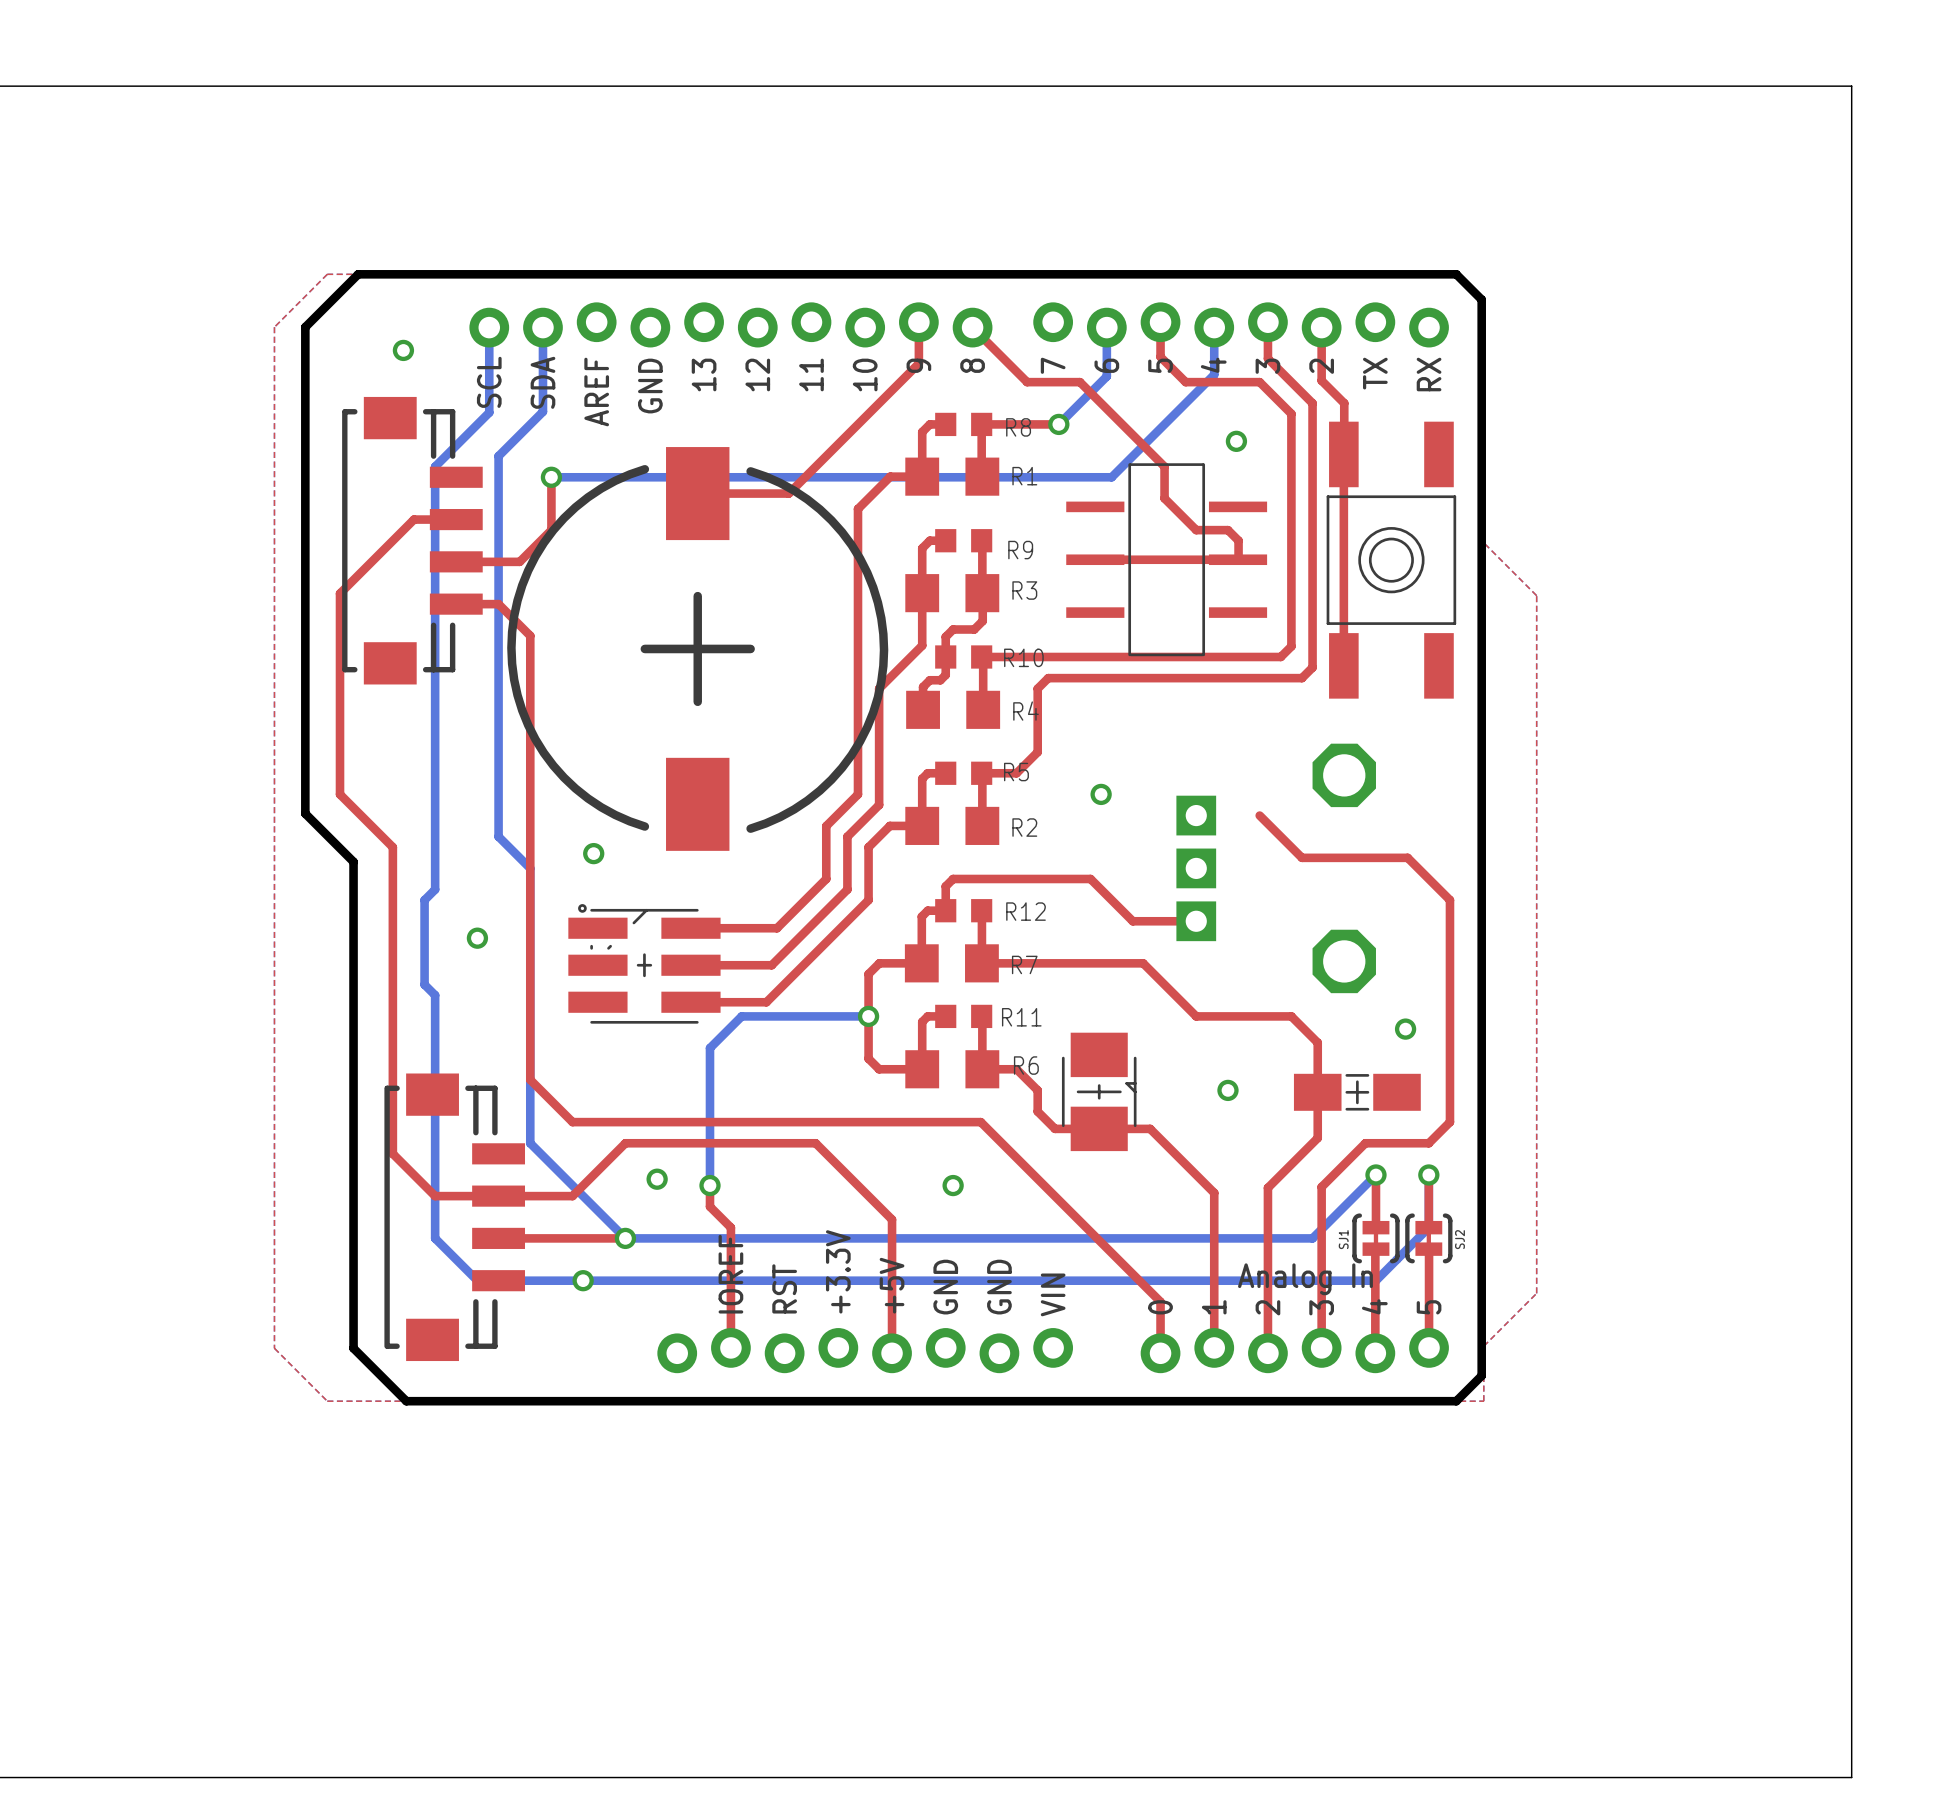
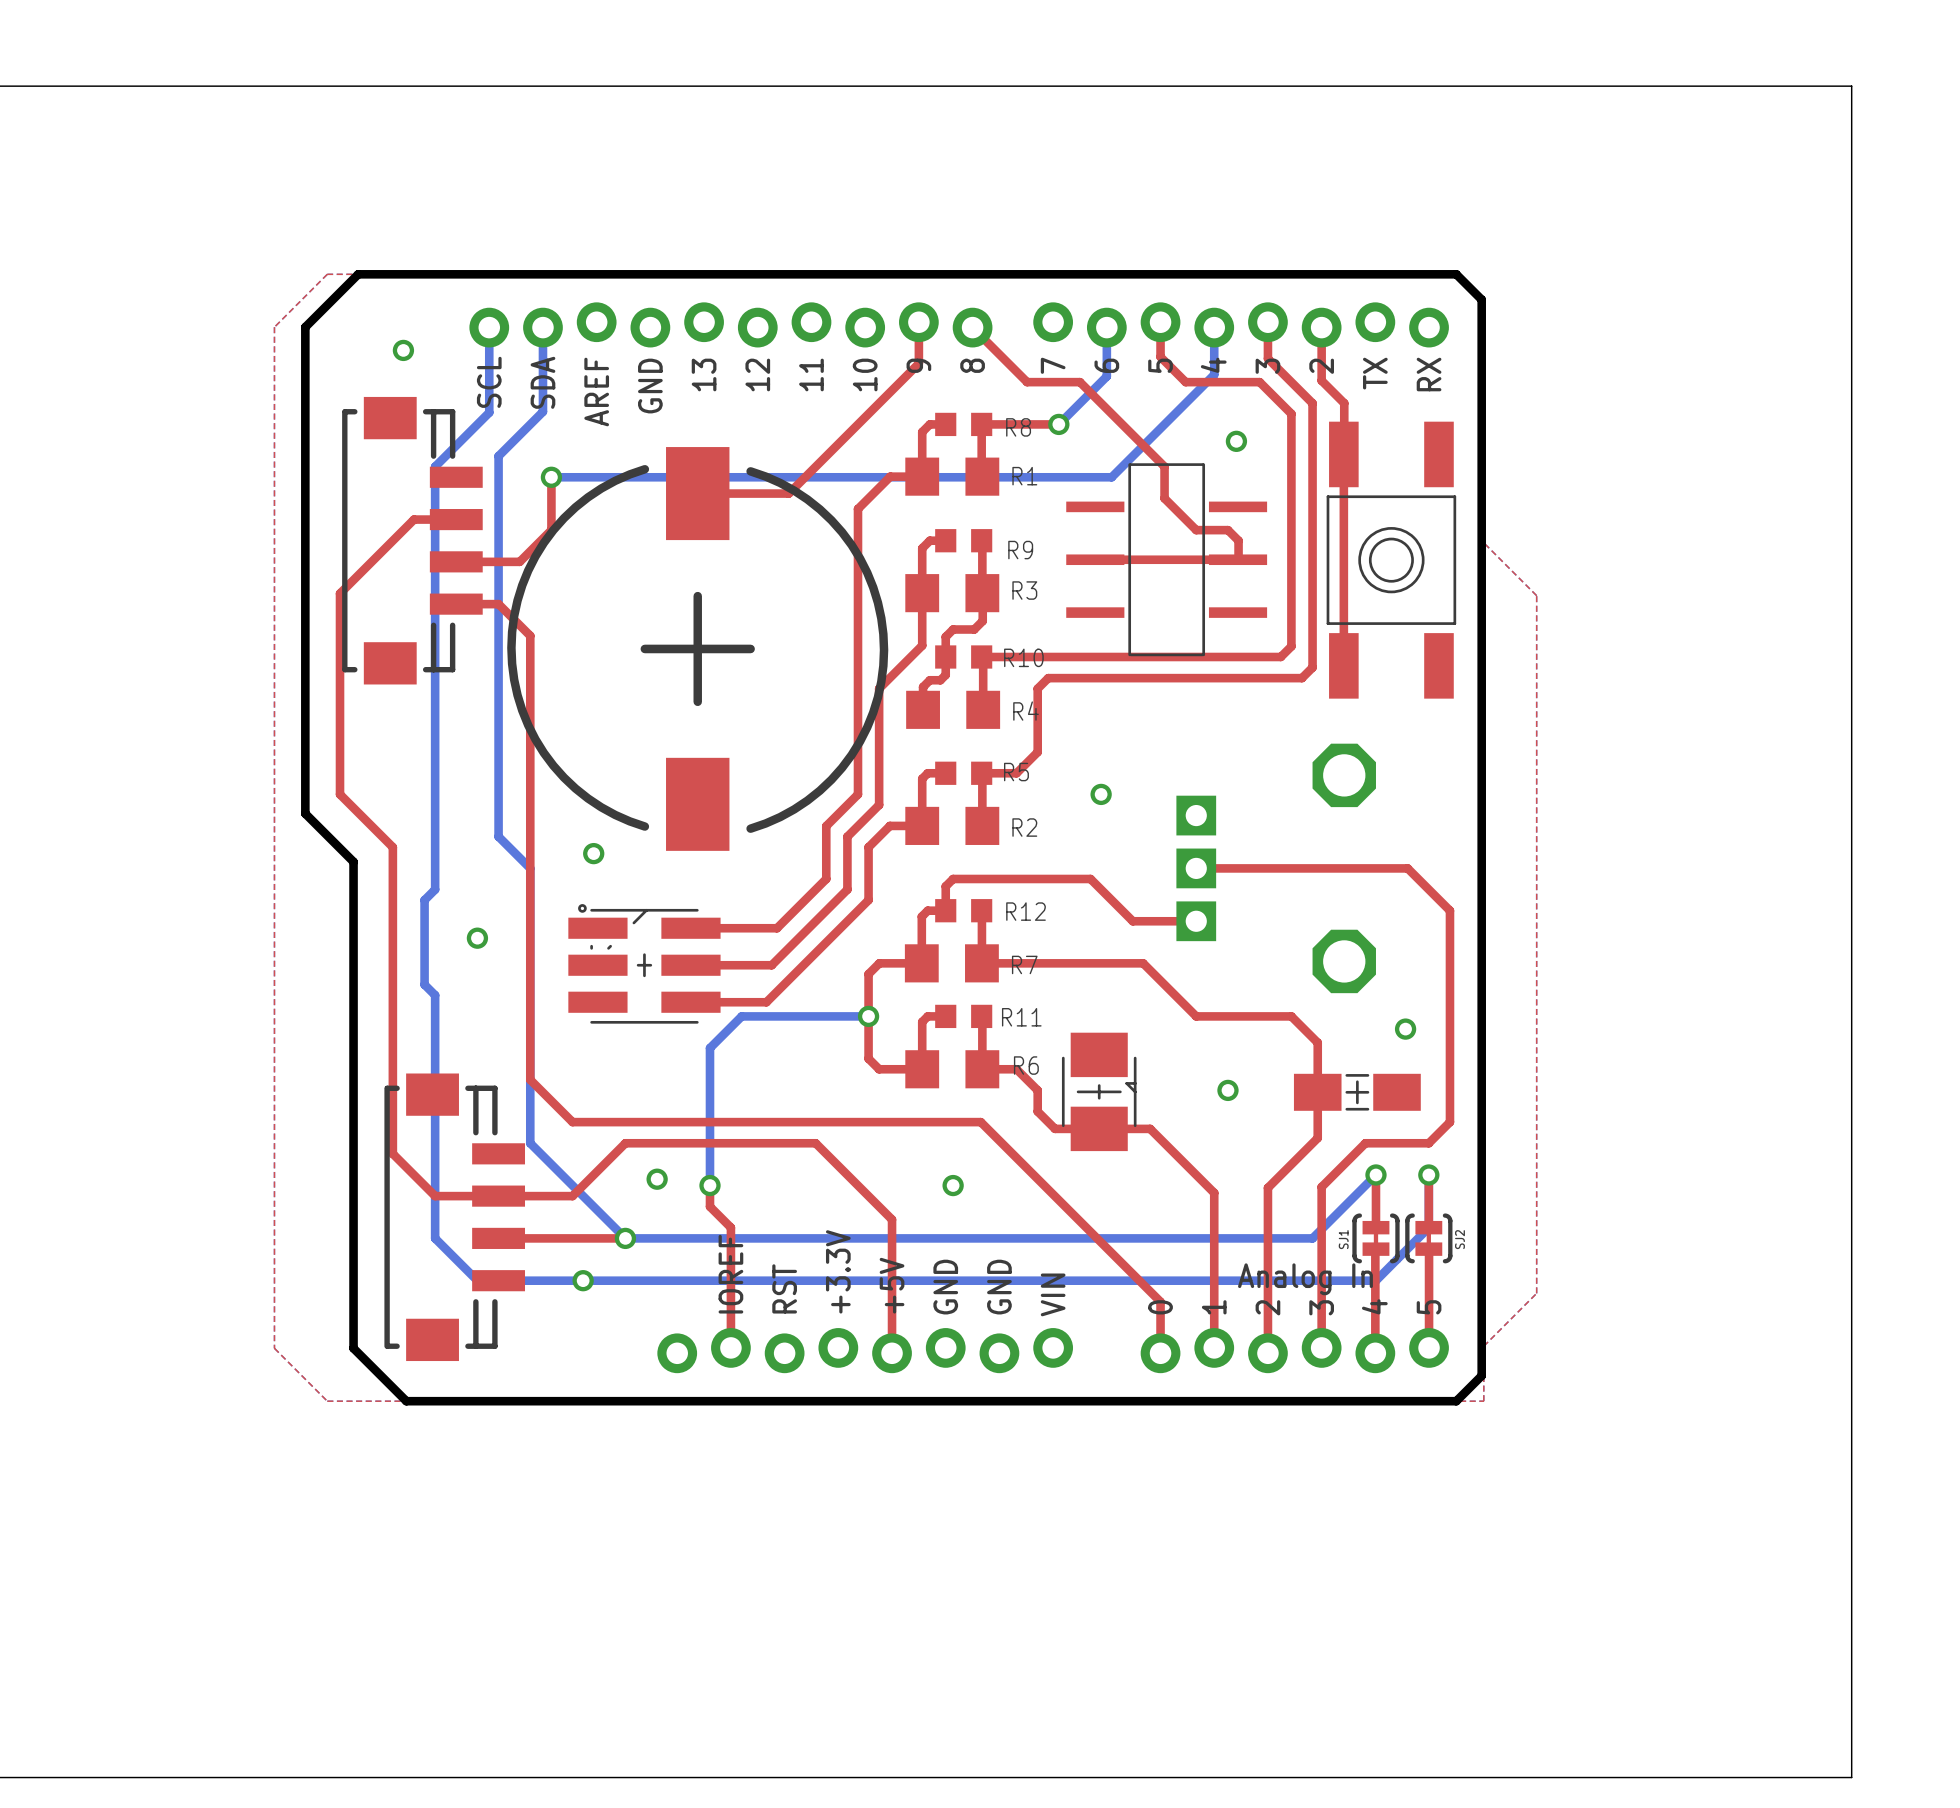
top track: (1259, 815) (1301, 857) (1407, 857) (1449, 900) (1449, 910) -> (1196, 868) (1407, 868) (1449, 910)

